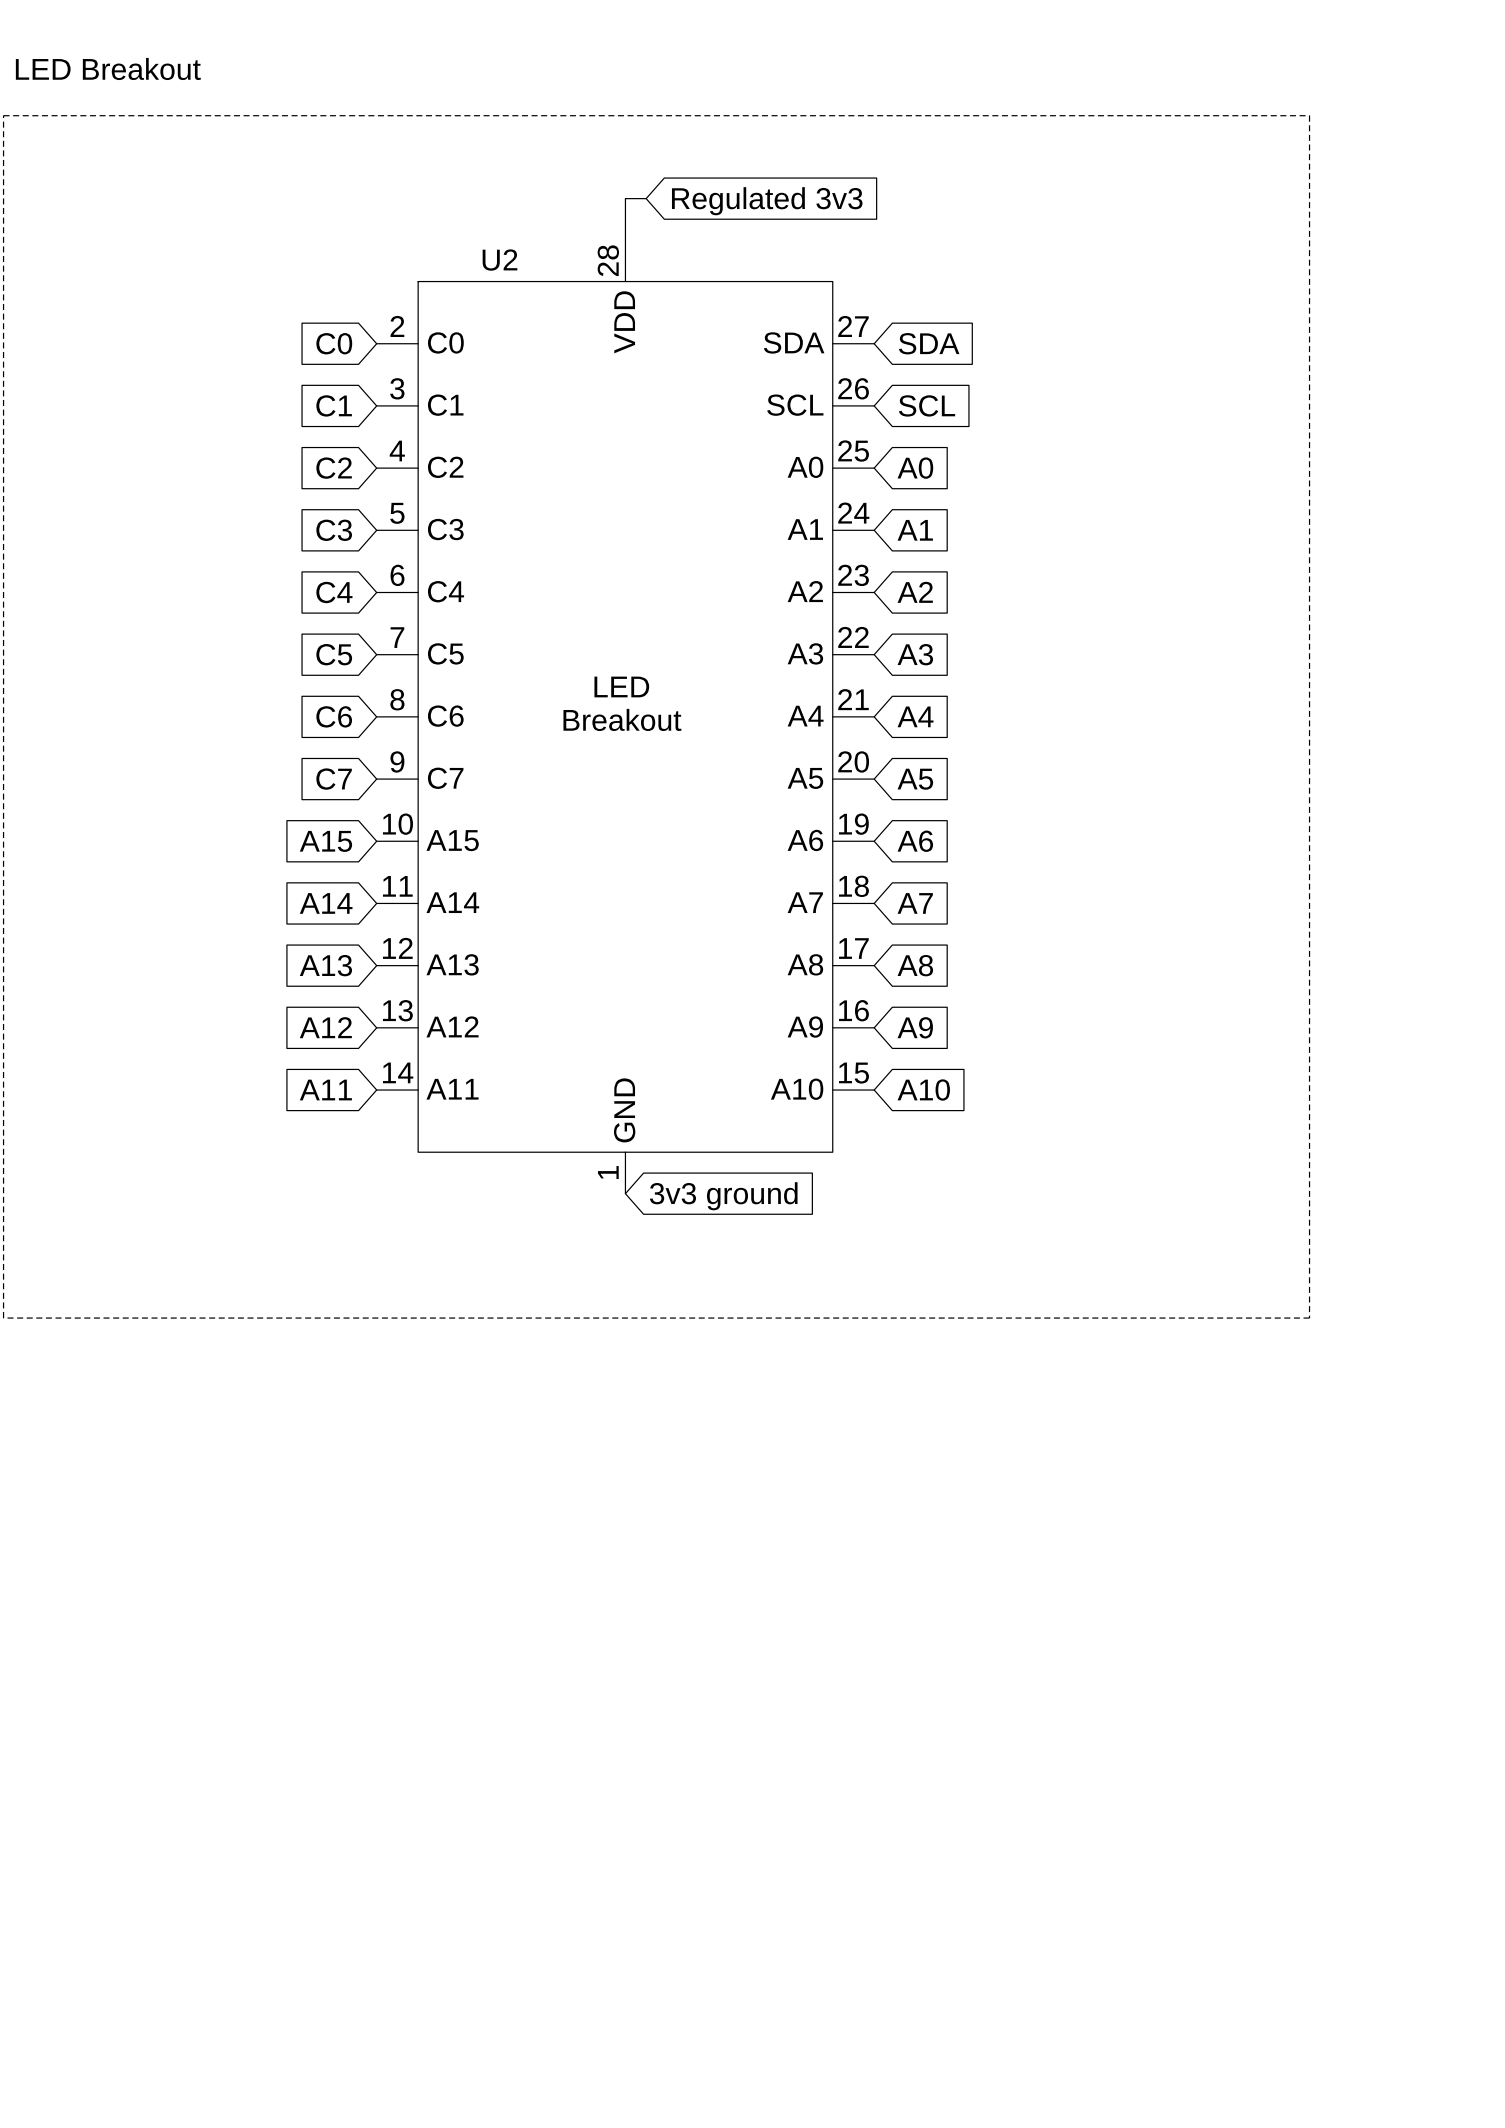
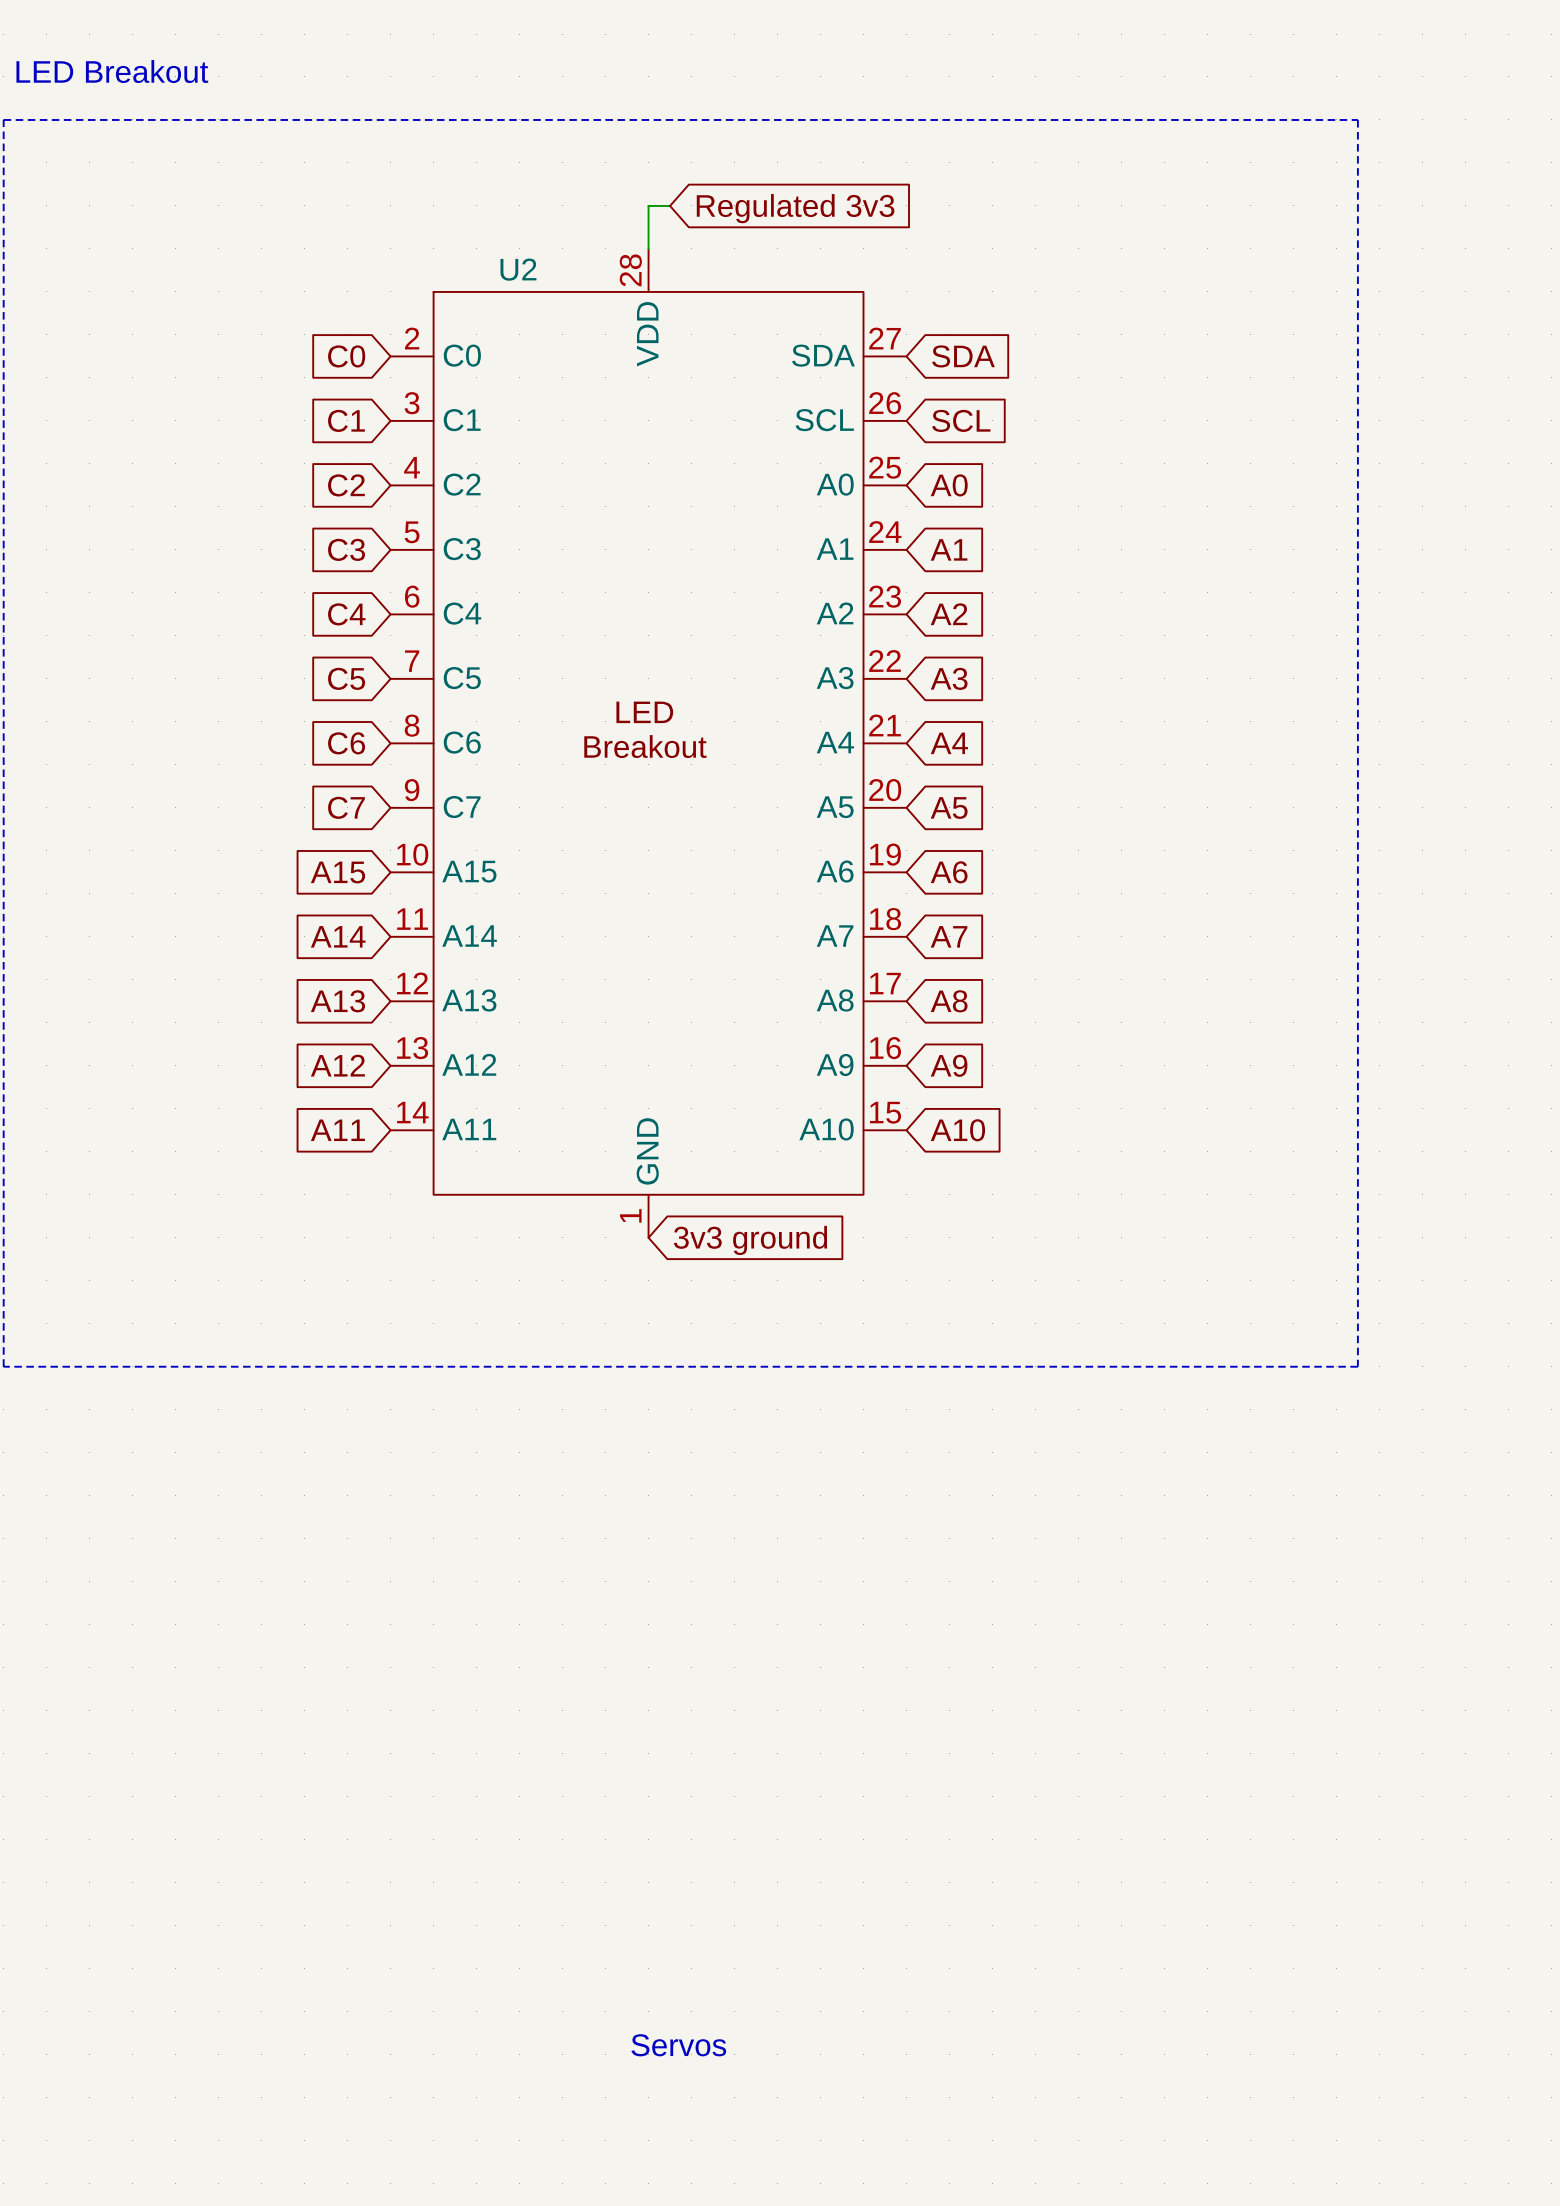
text: none -> Servos (678, 2045)

